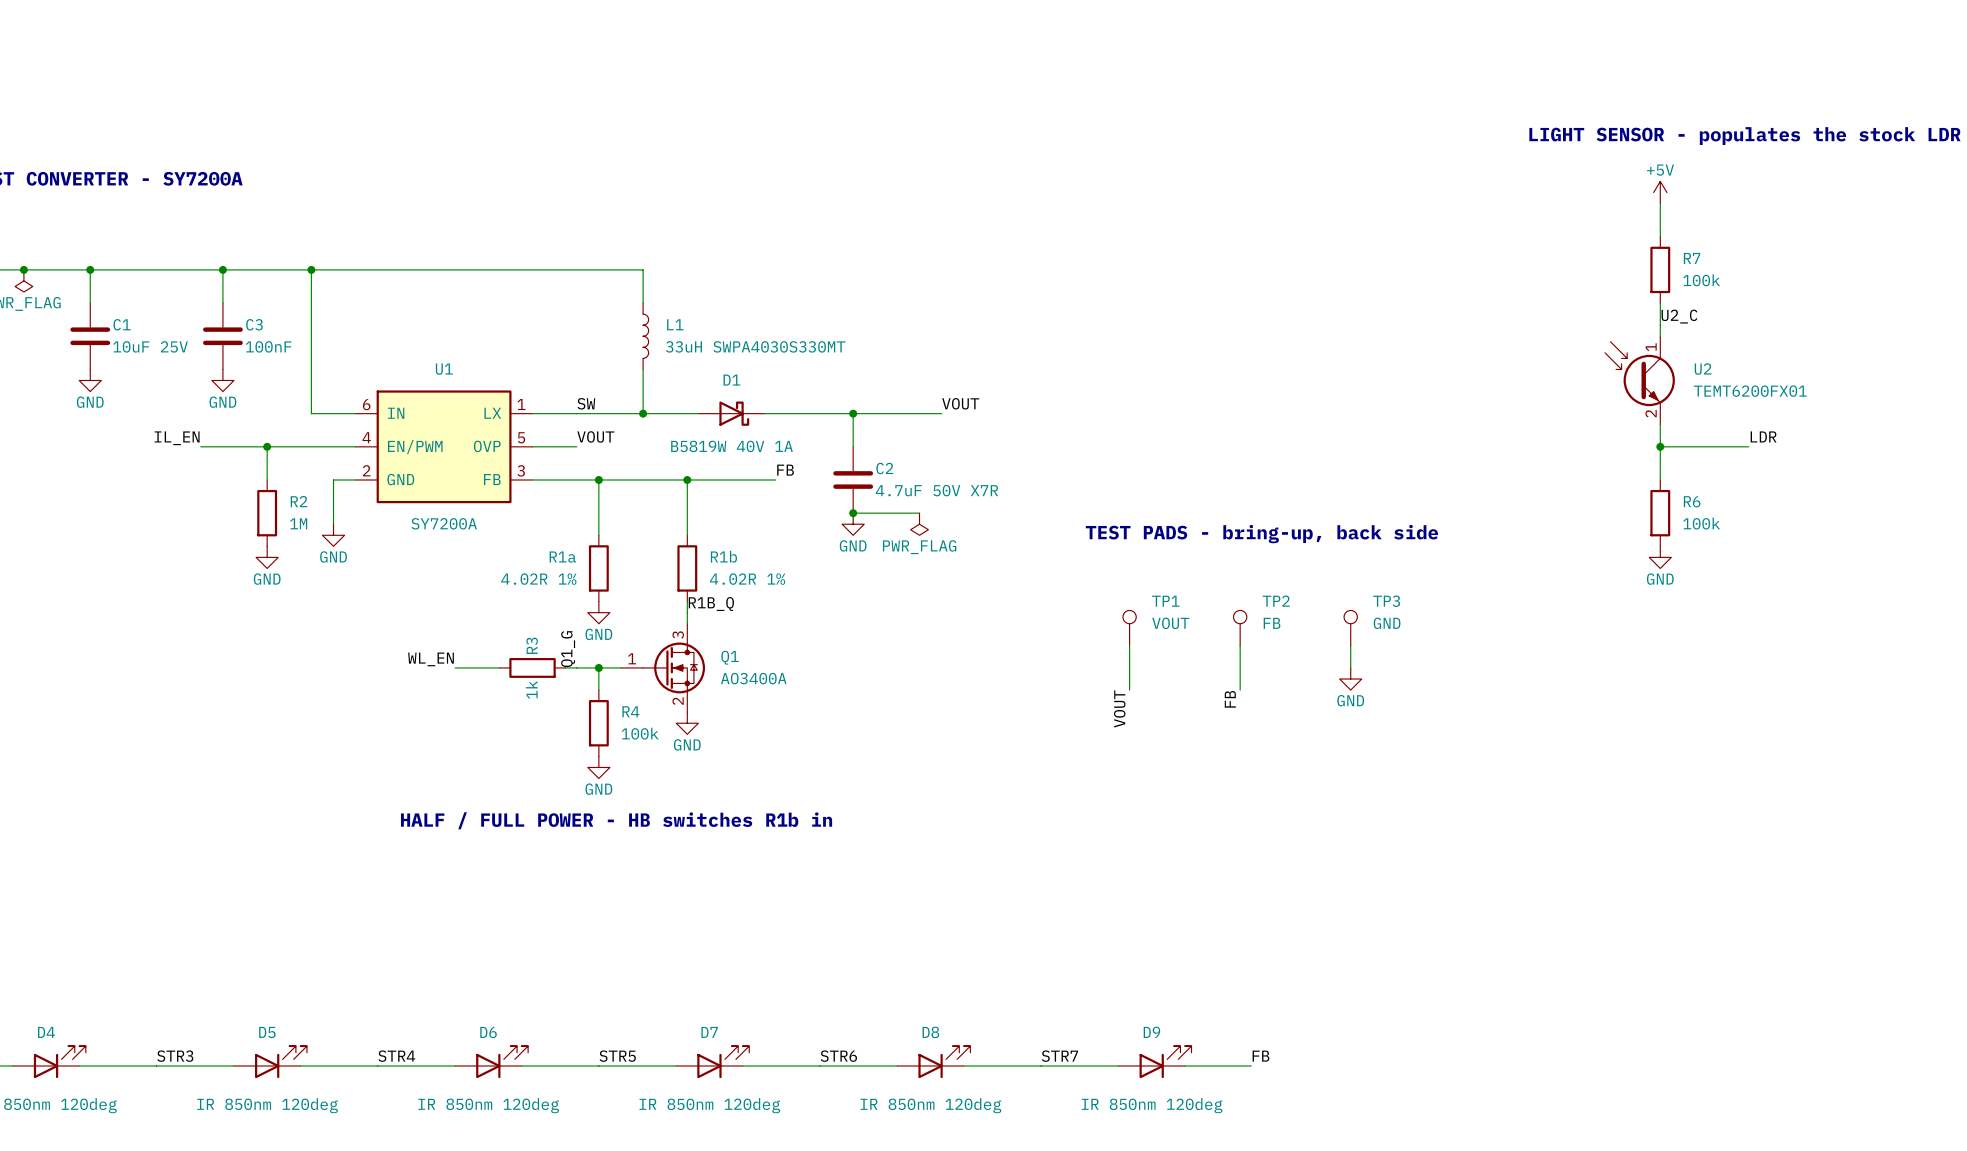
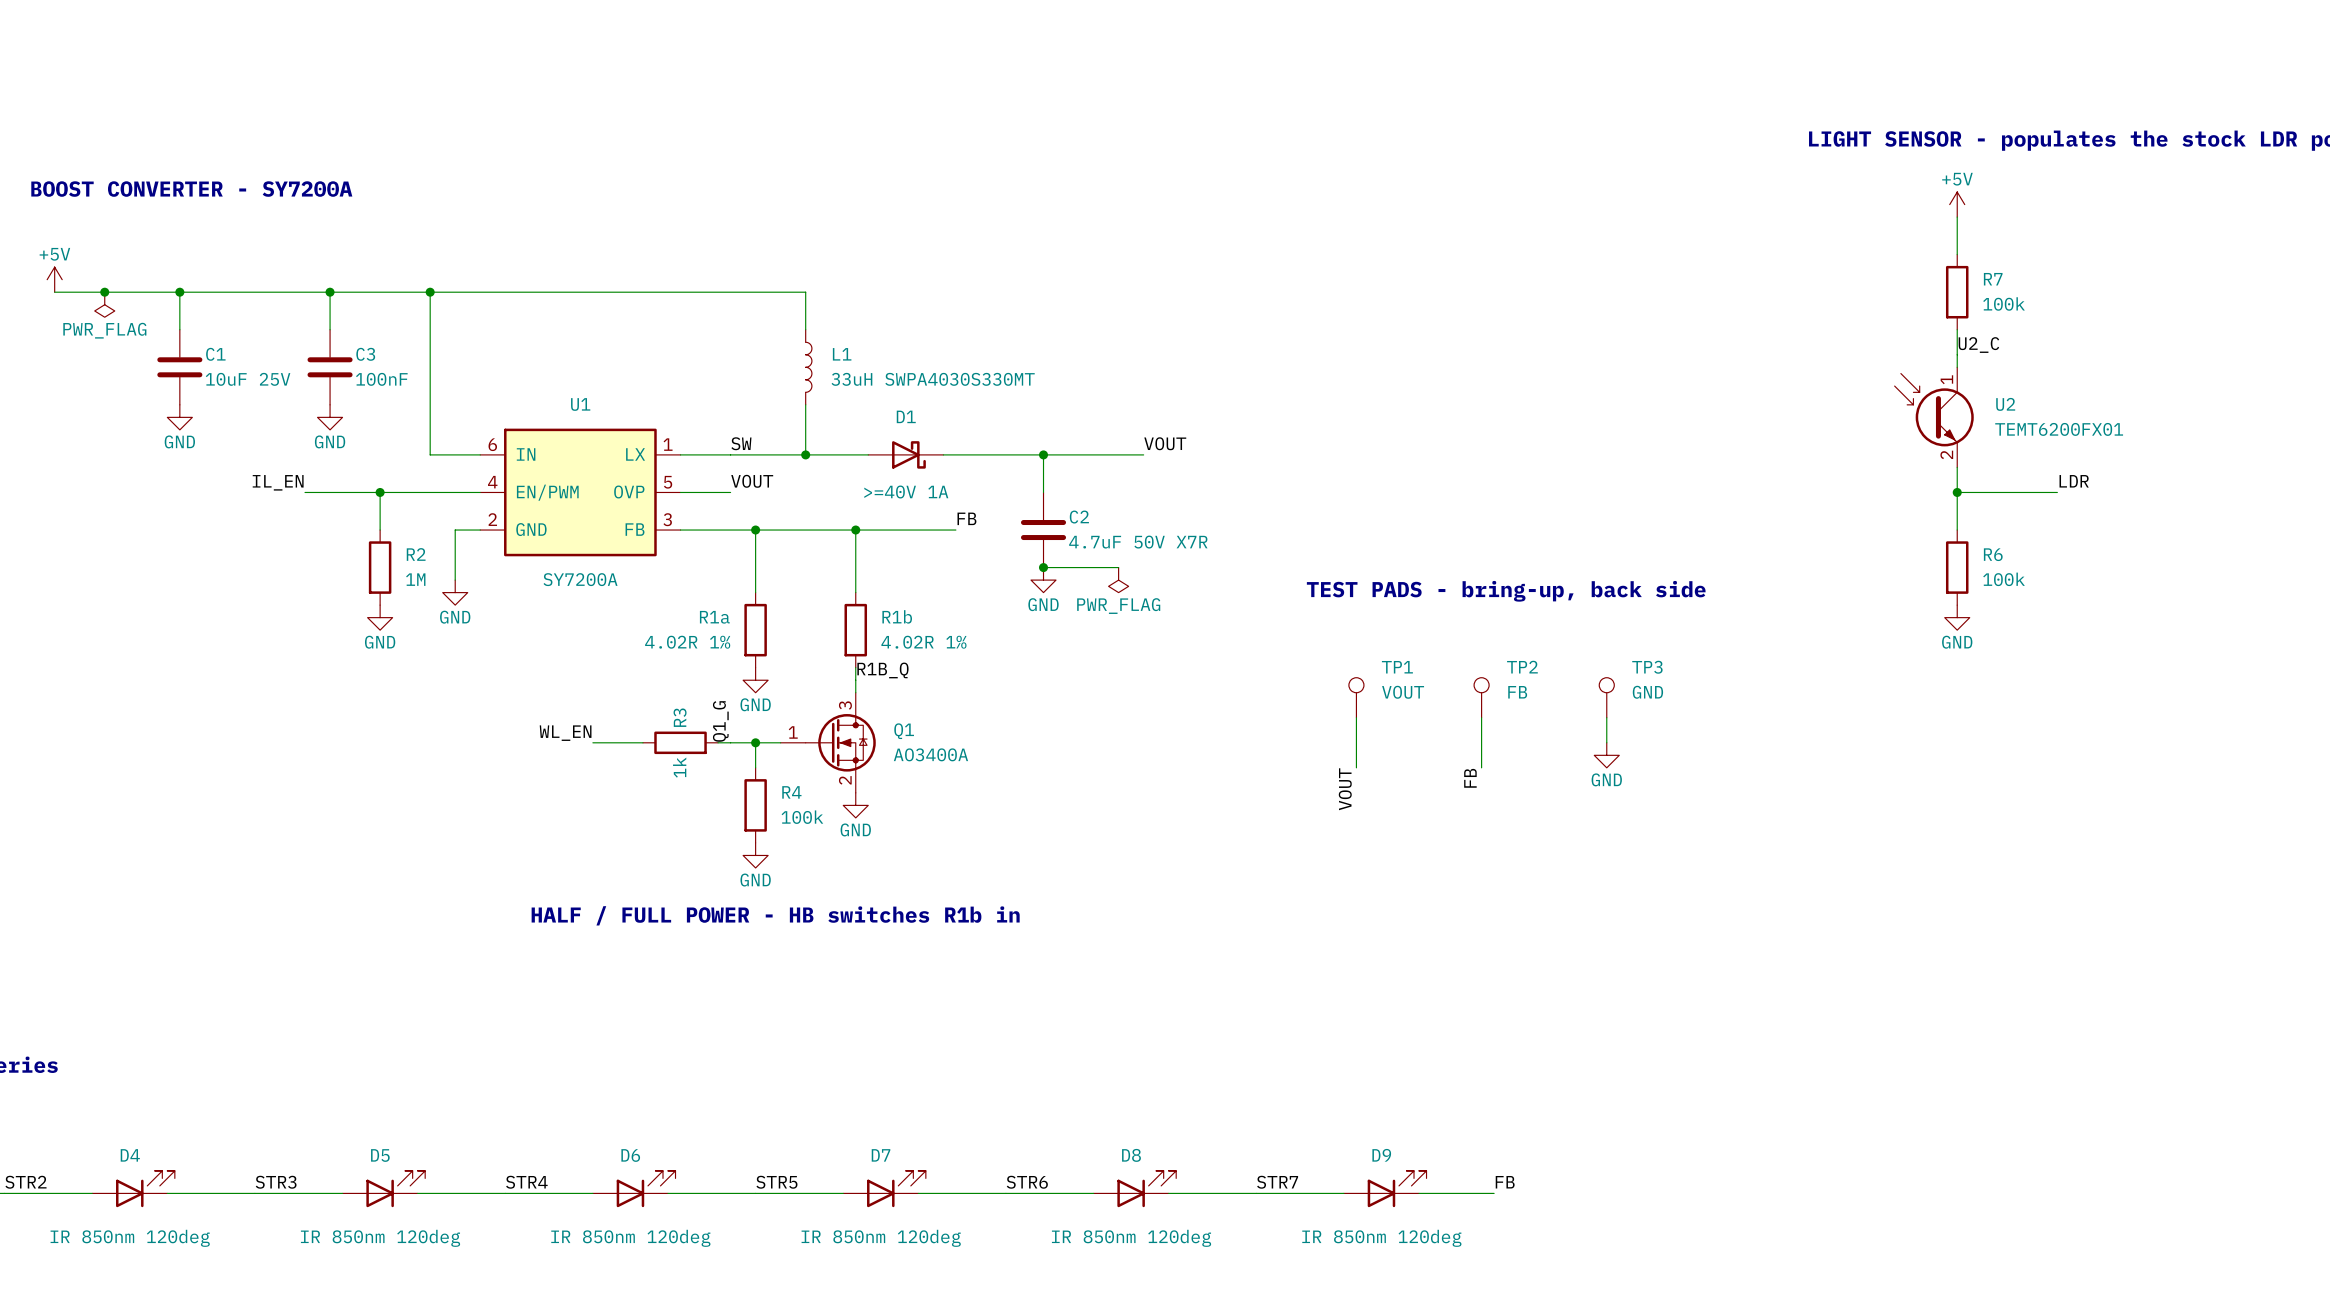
D1 value: B5819W 40V 1A (732, 446) -> >=40V 1A (906, 492)

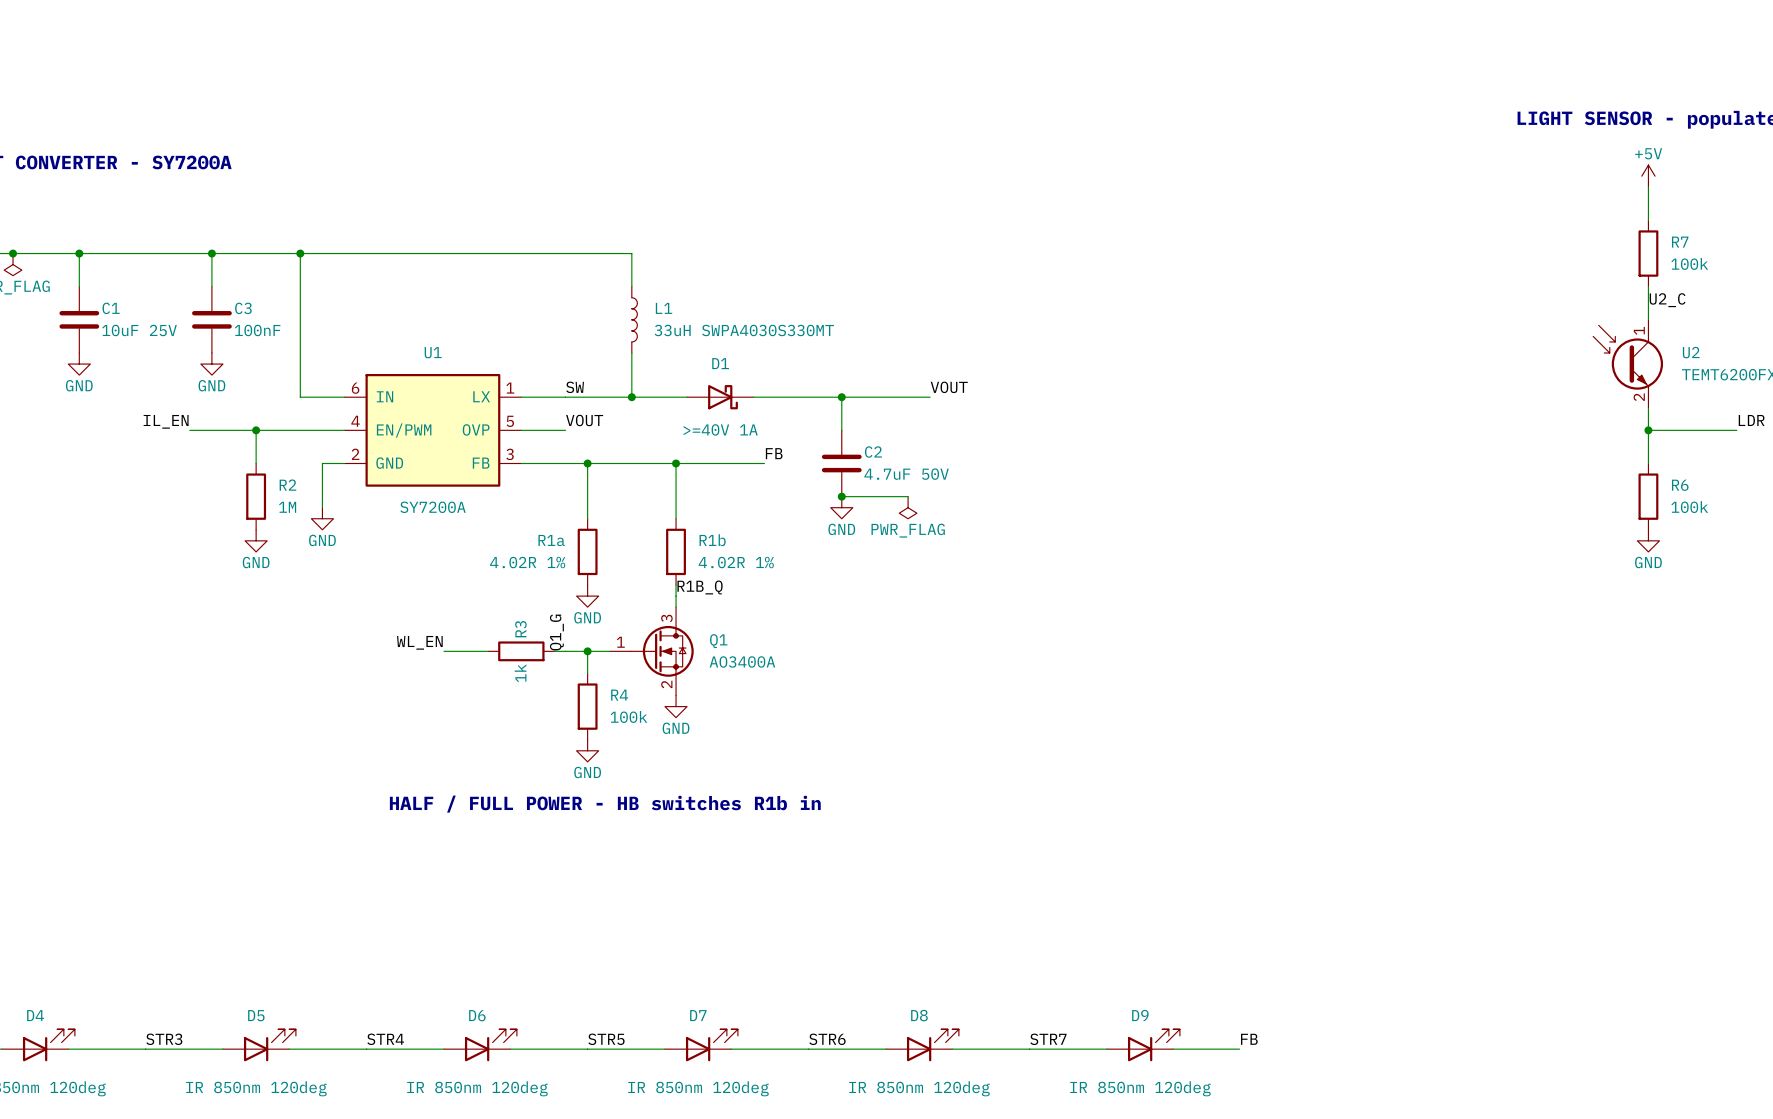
C2 value: 4.7uF 50V X7R (1138, 542) -> 4.7uF 50V (906, 474)
text: TEST PADS - bring-up, back side (1506, 591) -> none
TP1: VOUT (1356, 697) -> none
TP2: FB (1481, 697) -> none
TP3: GND (1606, 697) -> none
wire: (1356, 717) (1356, 767) -> none
wire: (1481, 717) (1481, 767) -> none
wire: (1606, 717) (1606, 742) -> none
power symbol: GND (1606, 755) -> none
label: FB (1470, 778) -> none
label: VOUT (1345, 789) -> none

